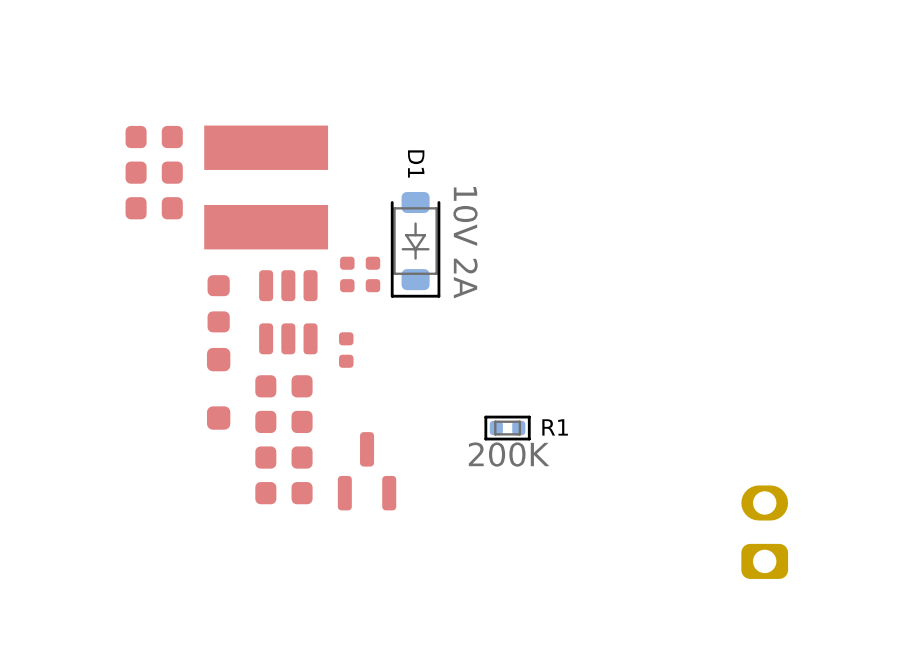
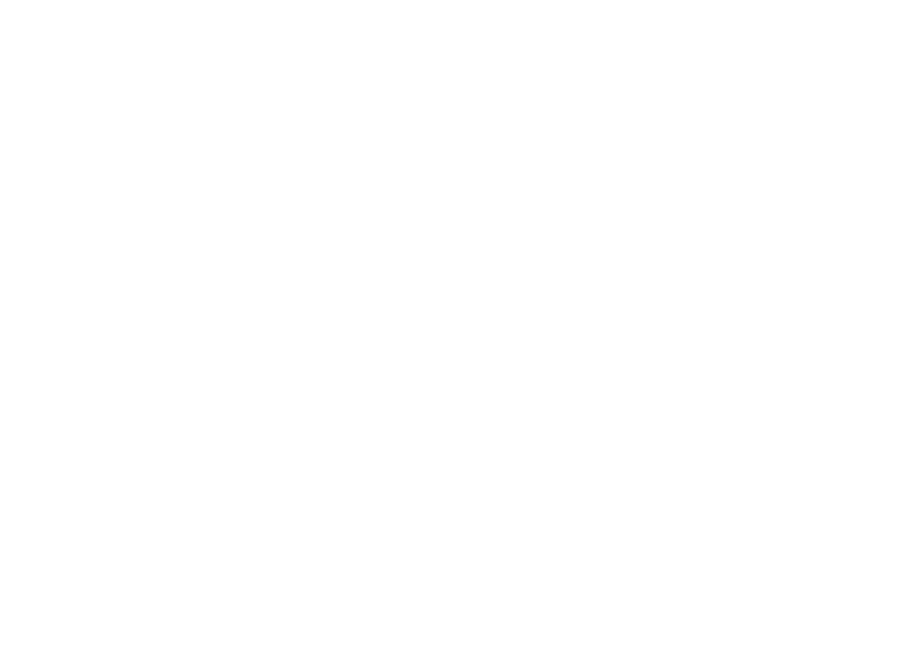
part: (154, 137) -> none
part: (154, 172) -> none
part: (266, 187) -> none
part: (154, 208) -> none
D1: 10V 2A (415, 244) -> none
part: (347, 274) -> none
part: (372, 274) -> none
part: (218, 303) -> none
part: (288, 312) -> none
part: (346, 350) -> none
part: (283, 386) -> none
part: (218, 388) -> none
part: (283, 421) -> none
R1: 200K (507, 428) -> none
part: (283, 457) -> none
part: (367, 471) -> none
part: (283, 493) -> none
part: (764, 532) -> none

